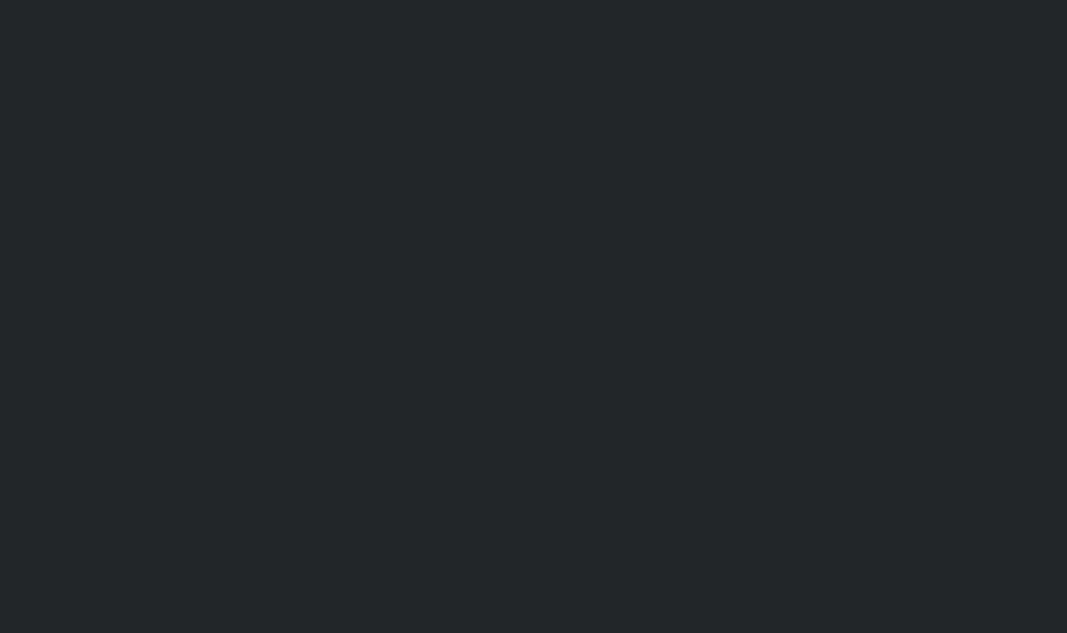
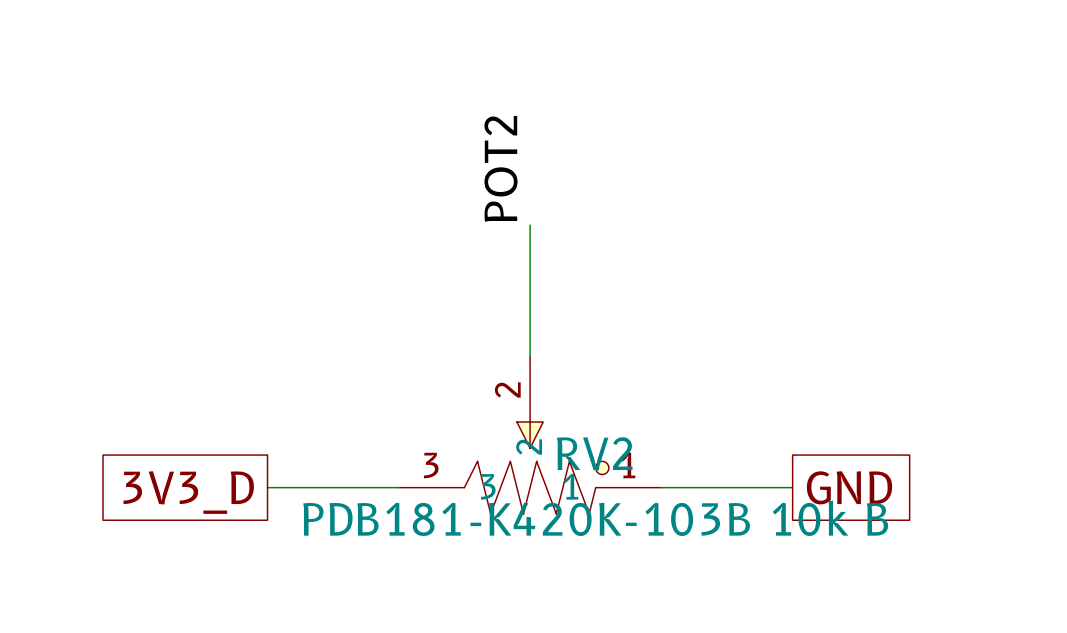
label: none -> POT2 (501, 168)
wire: none -> (530, 225) (530, 356)
RV2: none -> PDB181-K420K-103B 10k B (530, 435)
wire: none -> (267, 487) (398, 487)
wire: none -> (661, 487) (792, 487)
global label: none -> GND (849, 487)
global label: none -> 3V3_D (188, 492)

